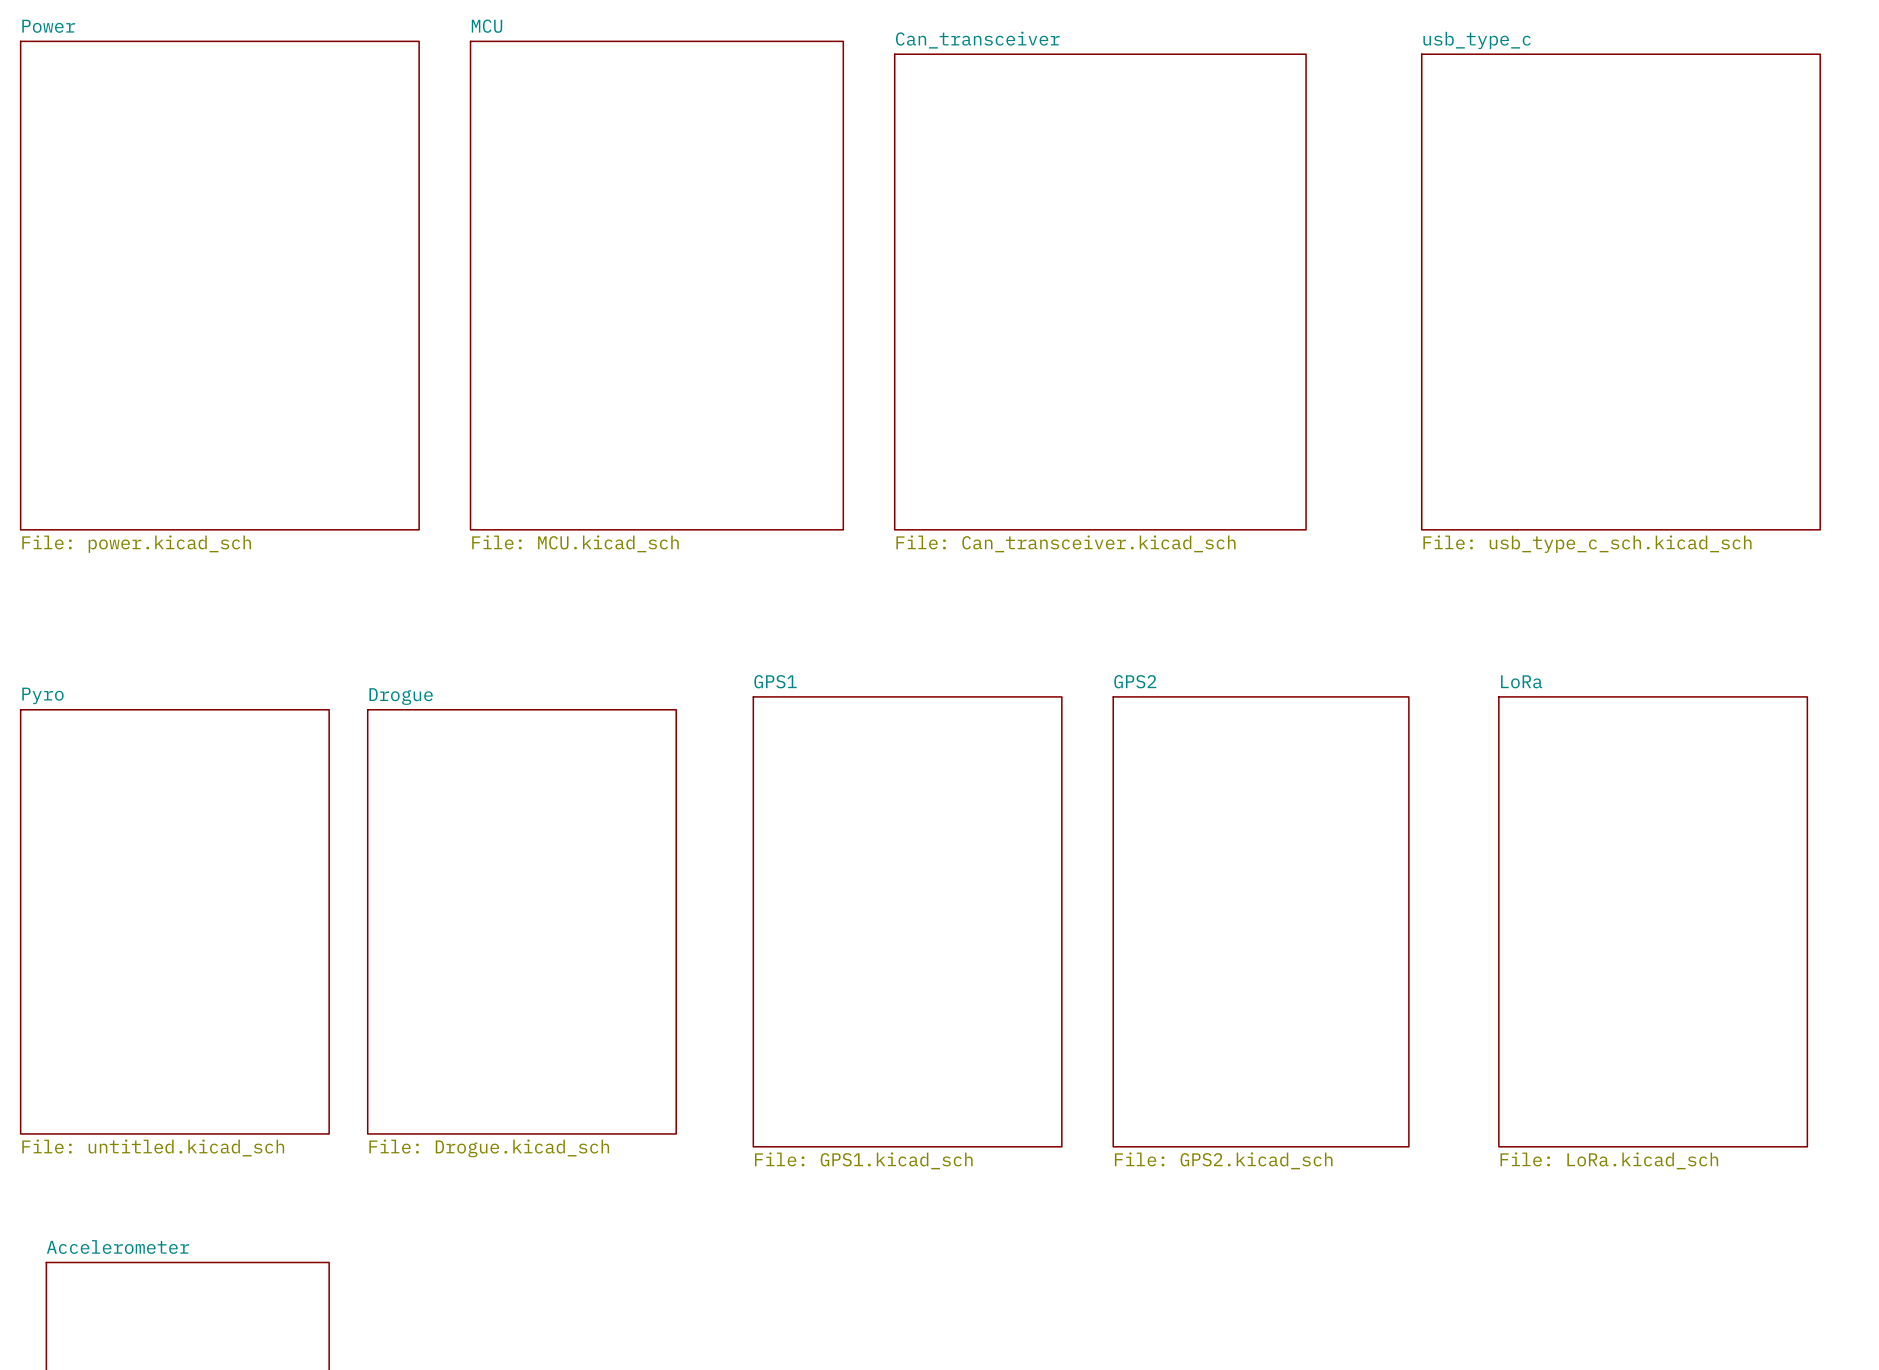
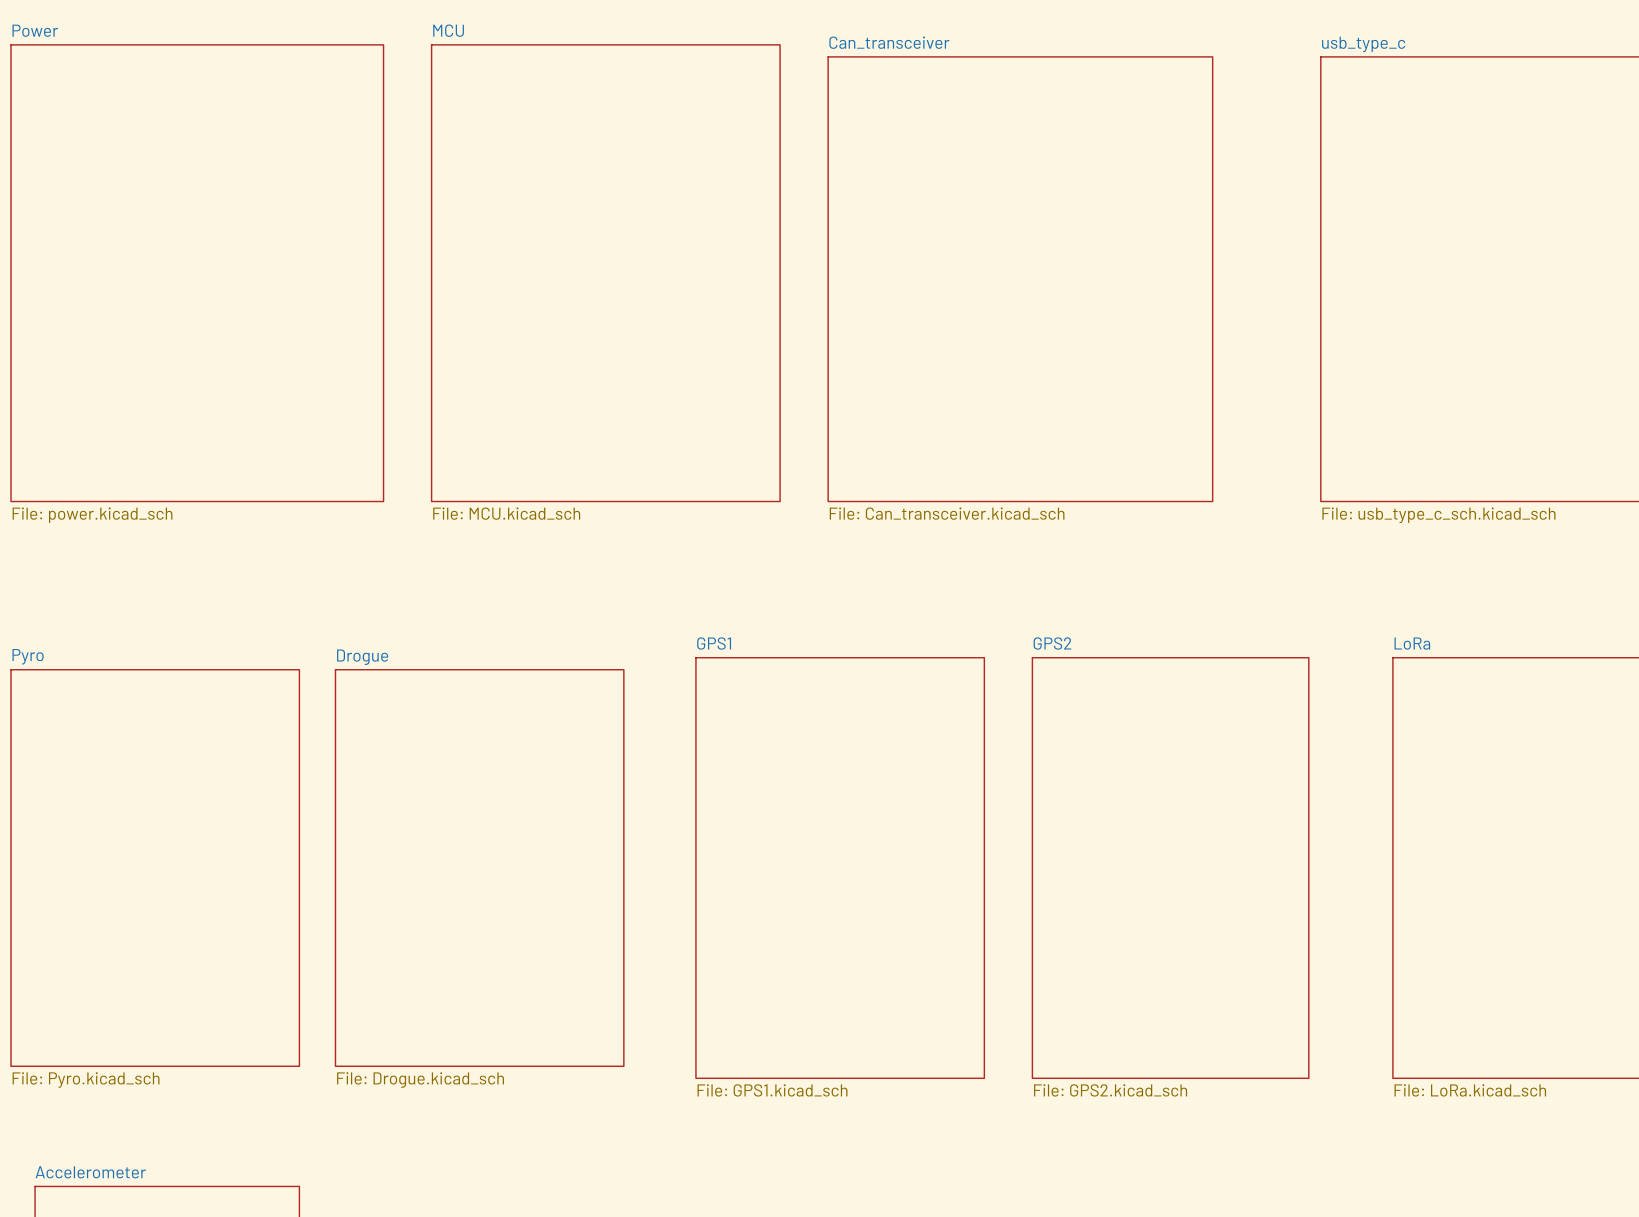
sheet Pyro value: File: untitled.kicad_sch (153, 1148) -> File: Pyro.kicad_sch (86, 1080)

